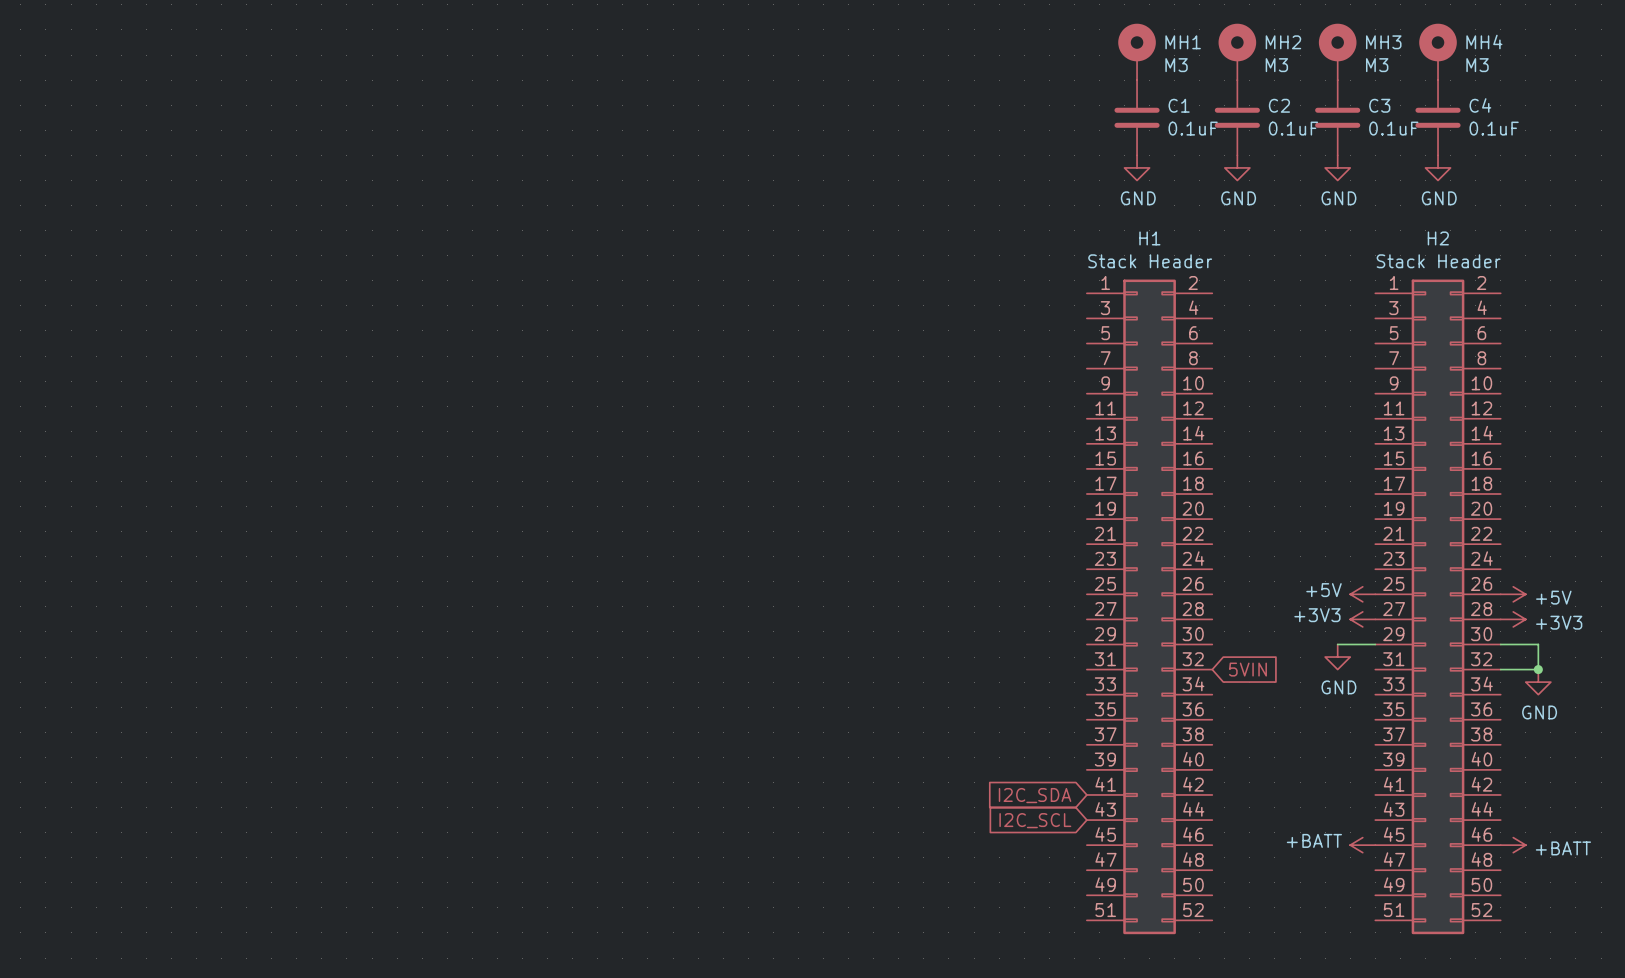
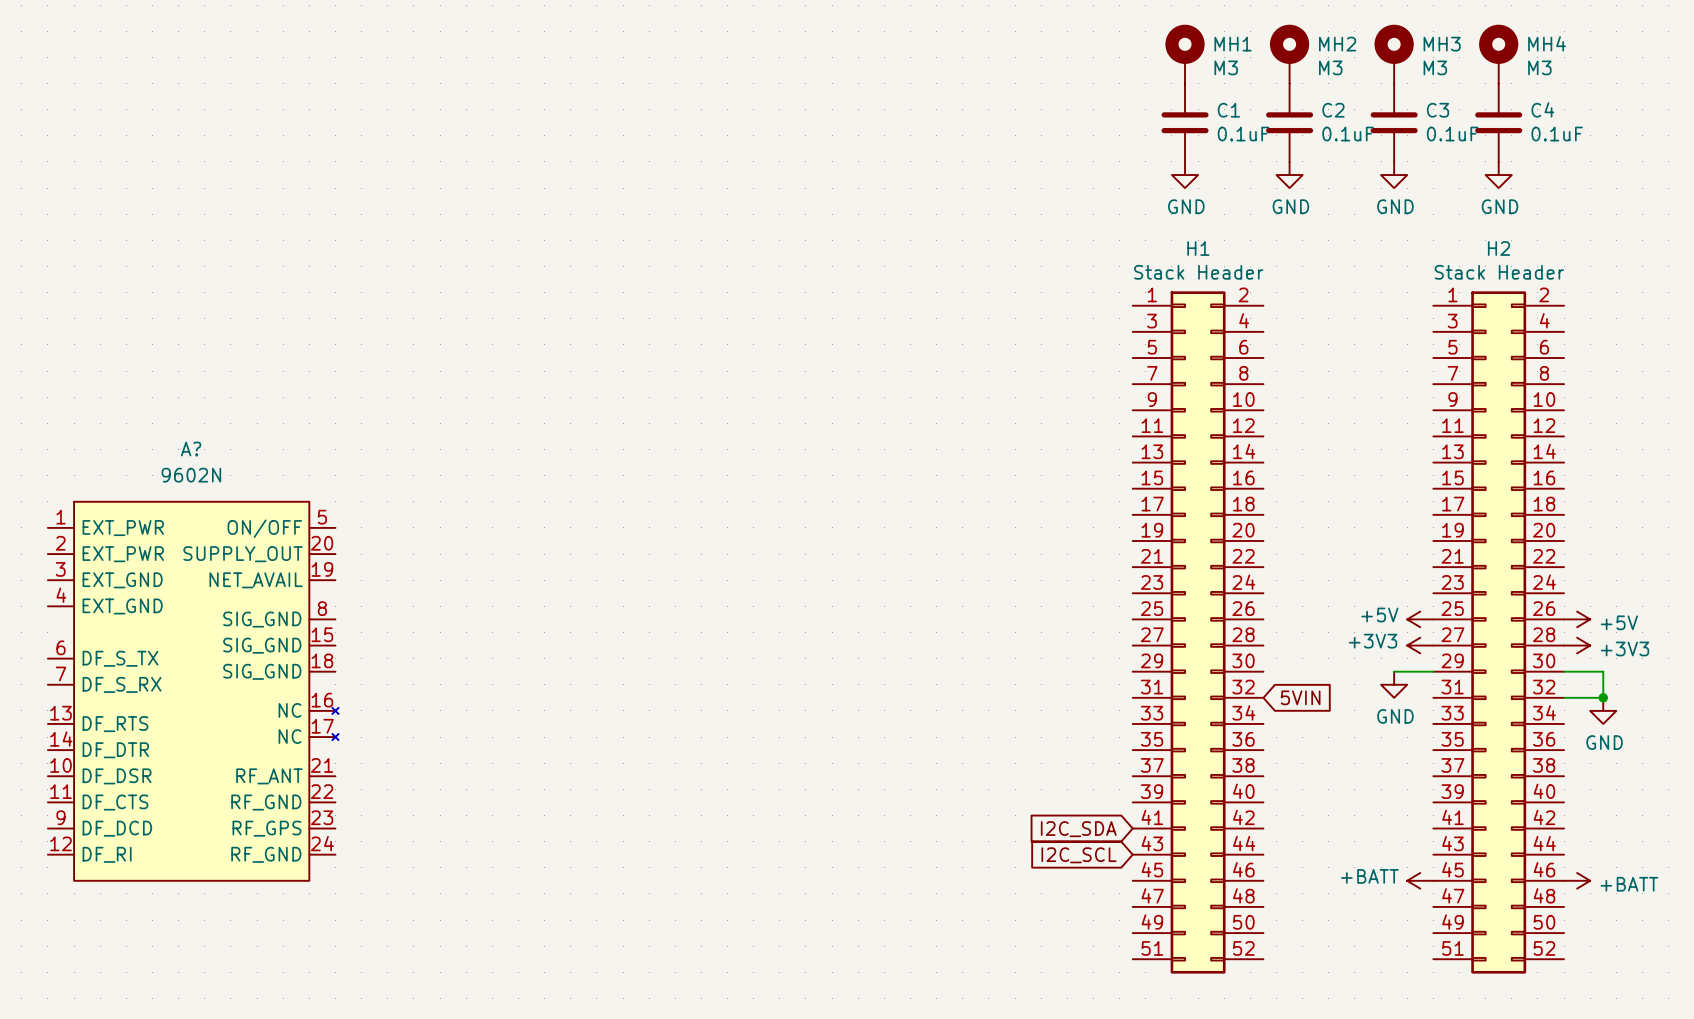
A?: none -> 9602N (193, 691)

